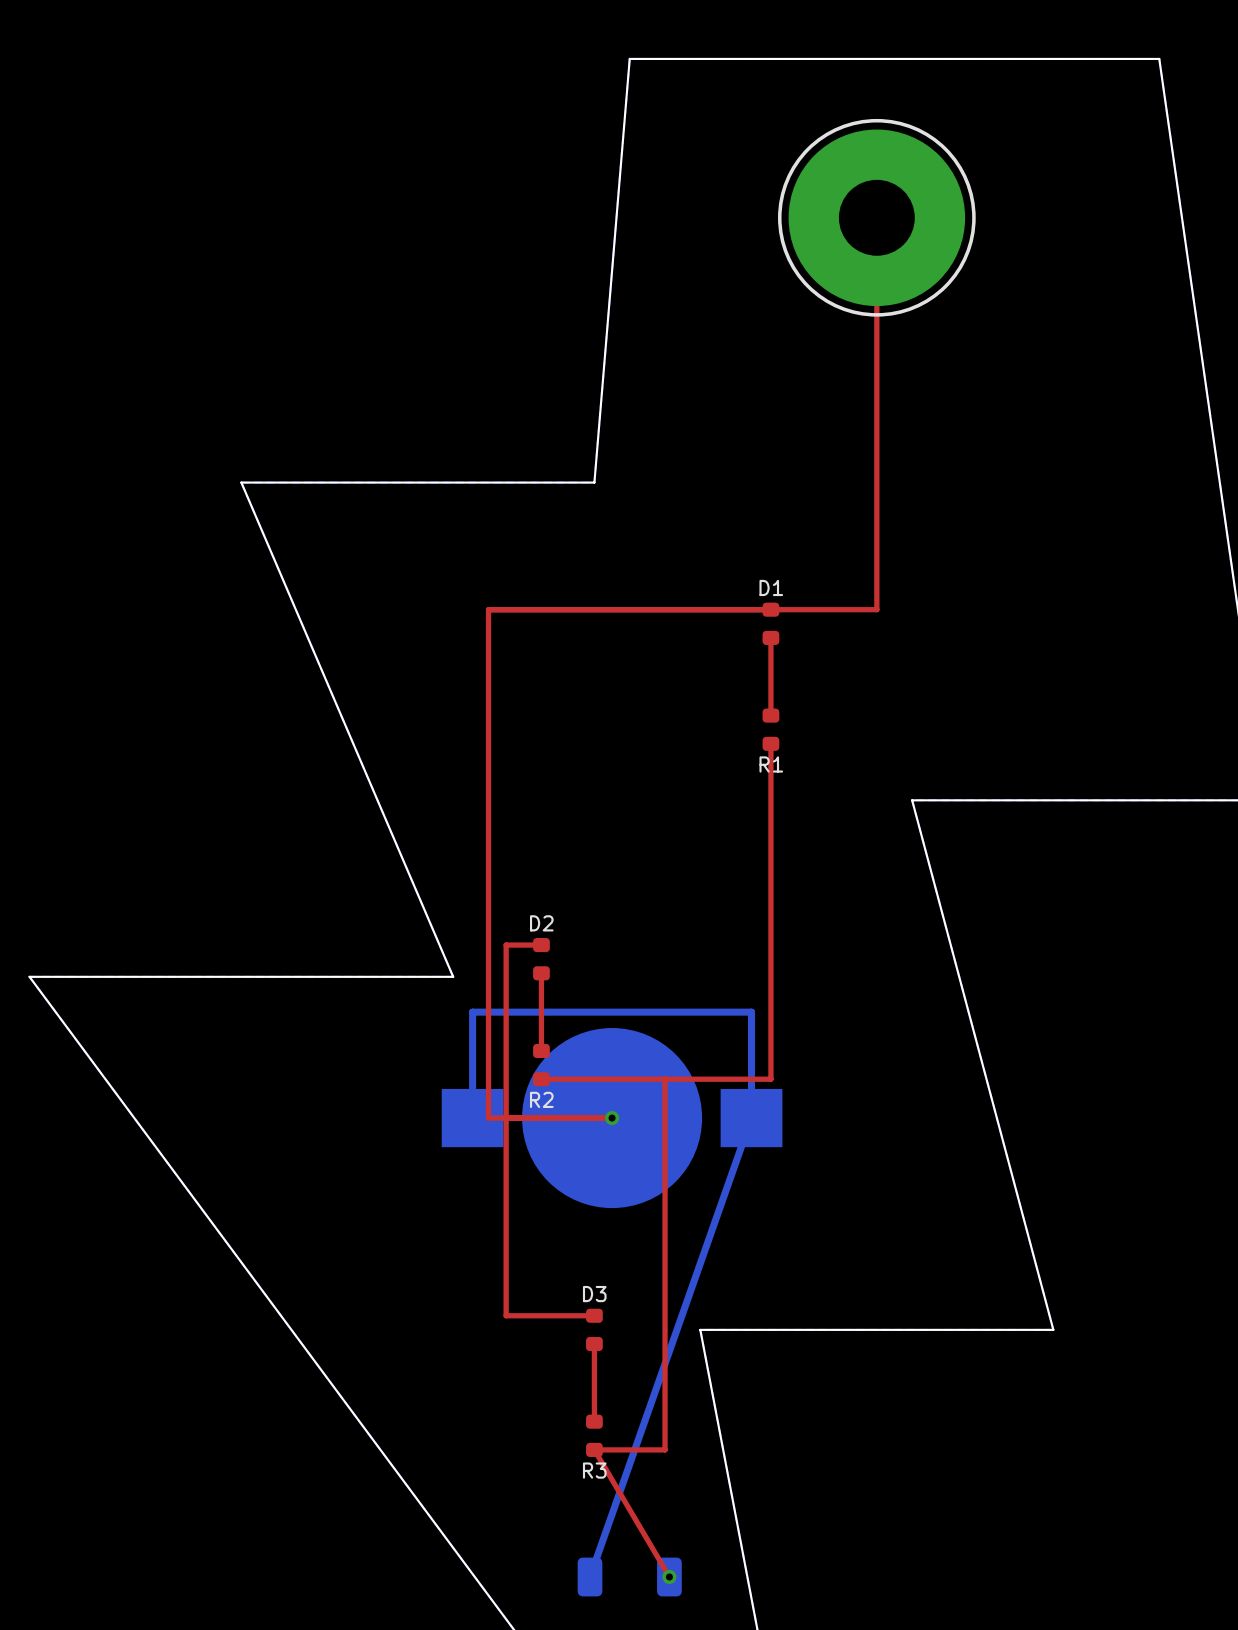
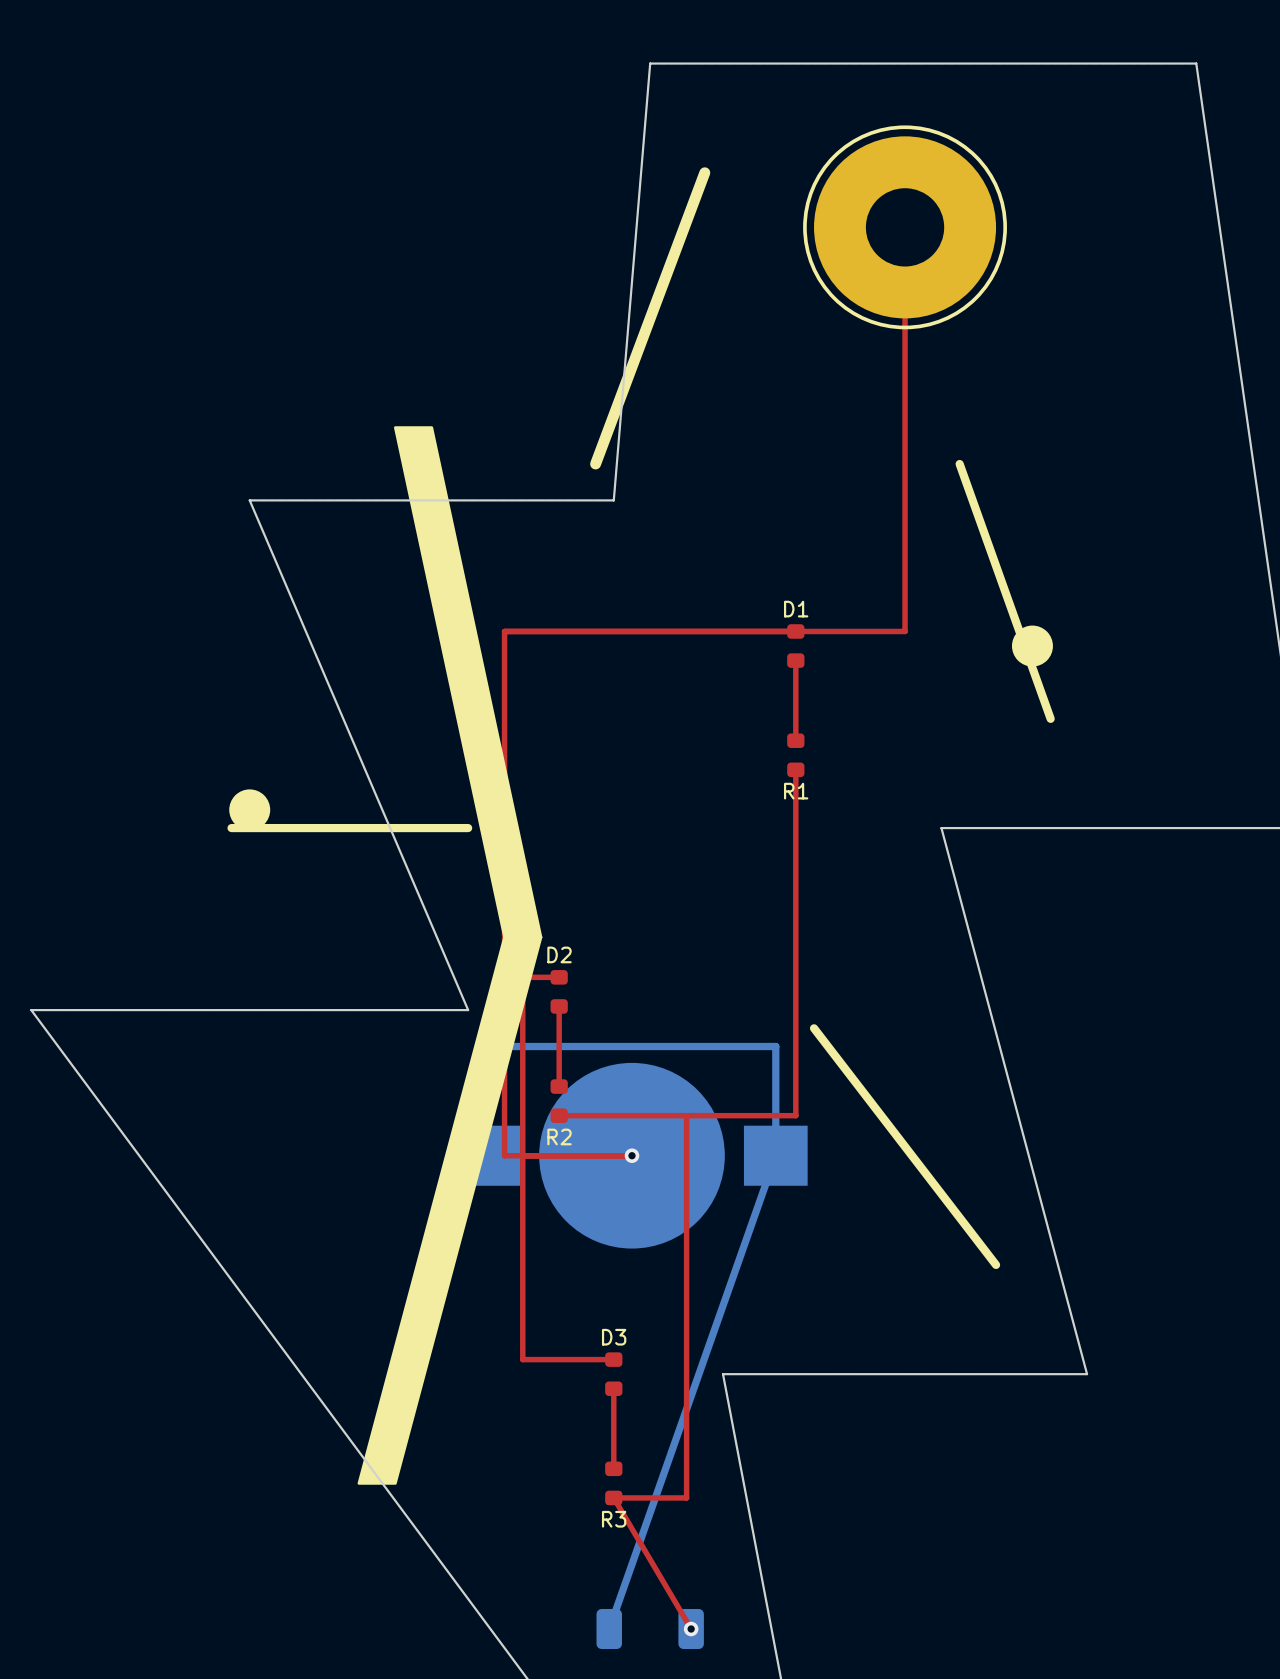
line: none -> (704, 172) (595, 464)
drawing: none -> [357, 426, 543, 1485]
line: none -> (959, 464) (1050, 718)
drawing: none -> [1011, 625, 1053, 667]
drawing: none -> [229, 789, 271, 831]
line: none -> (231, 828) (468, 828)
line: none -> (814, 1028) (996, 1264)

